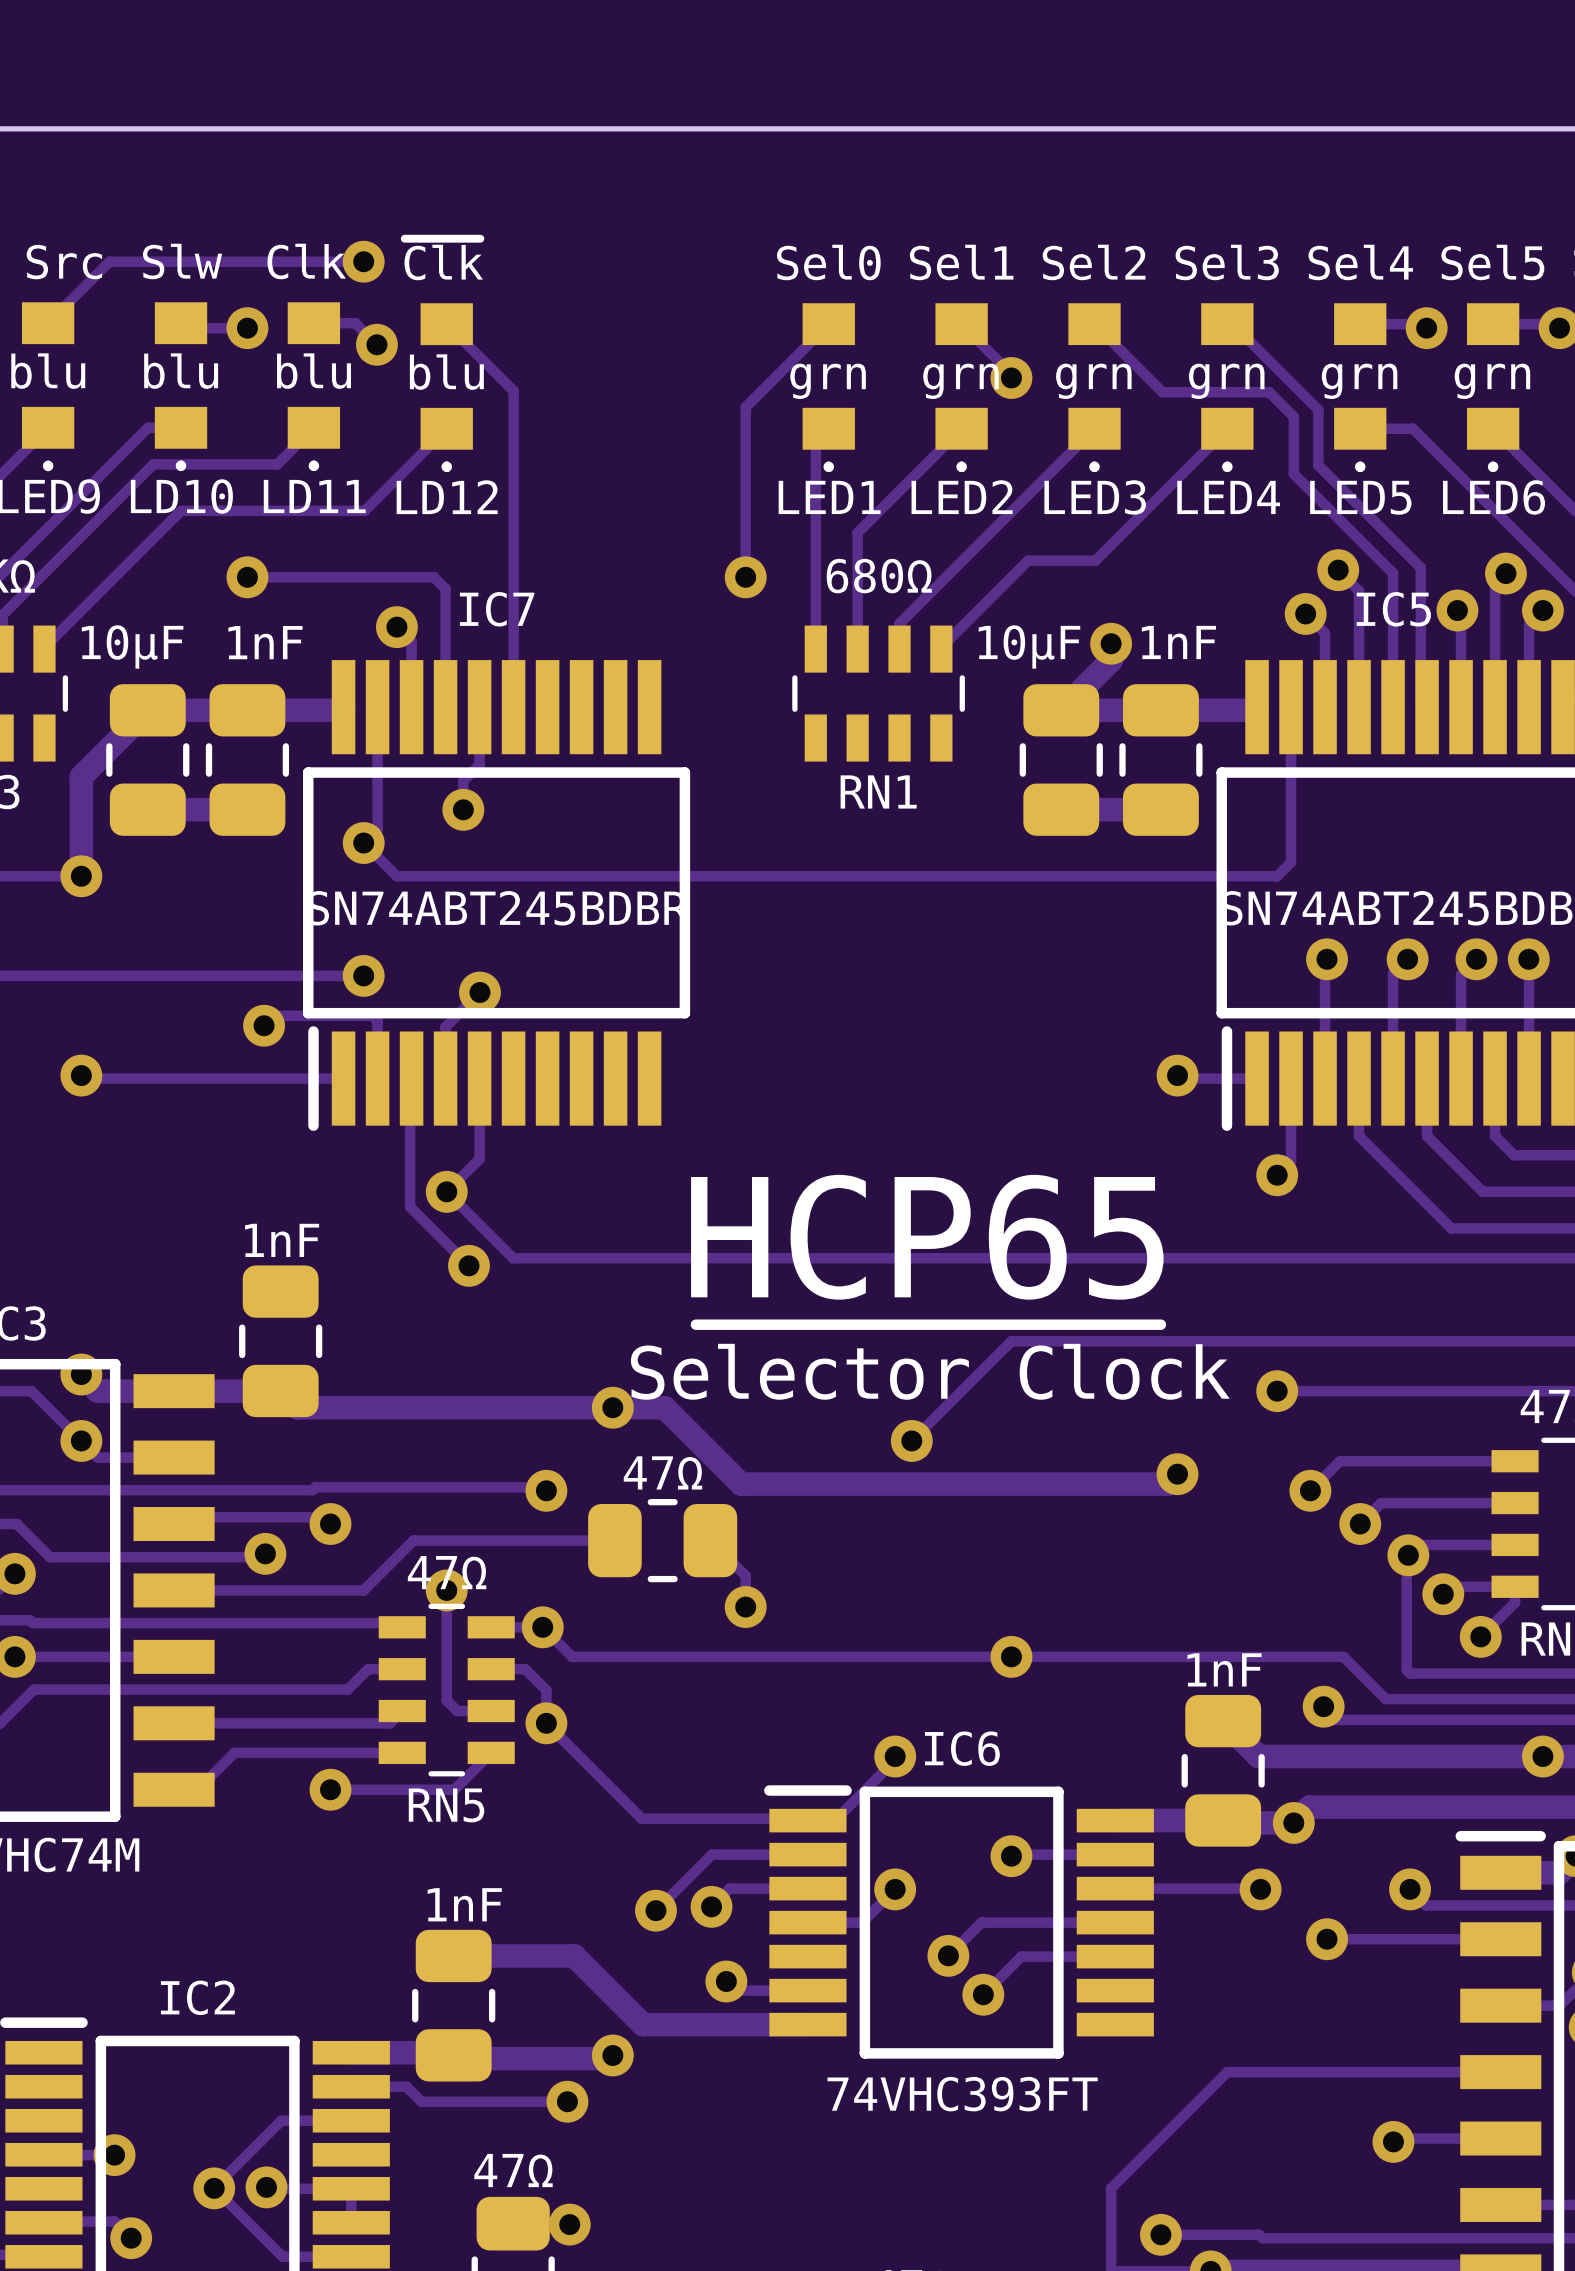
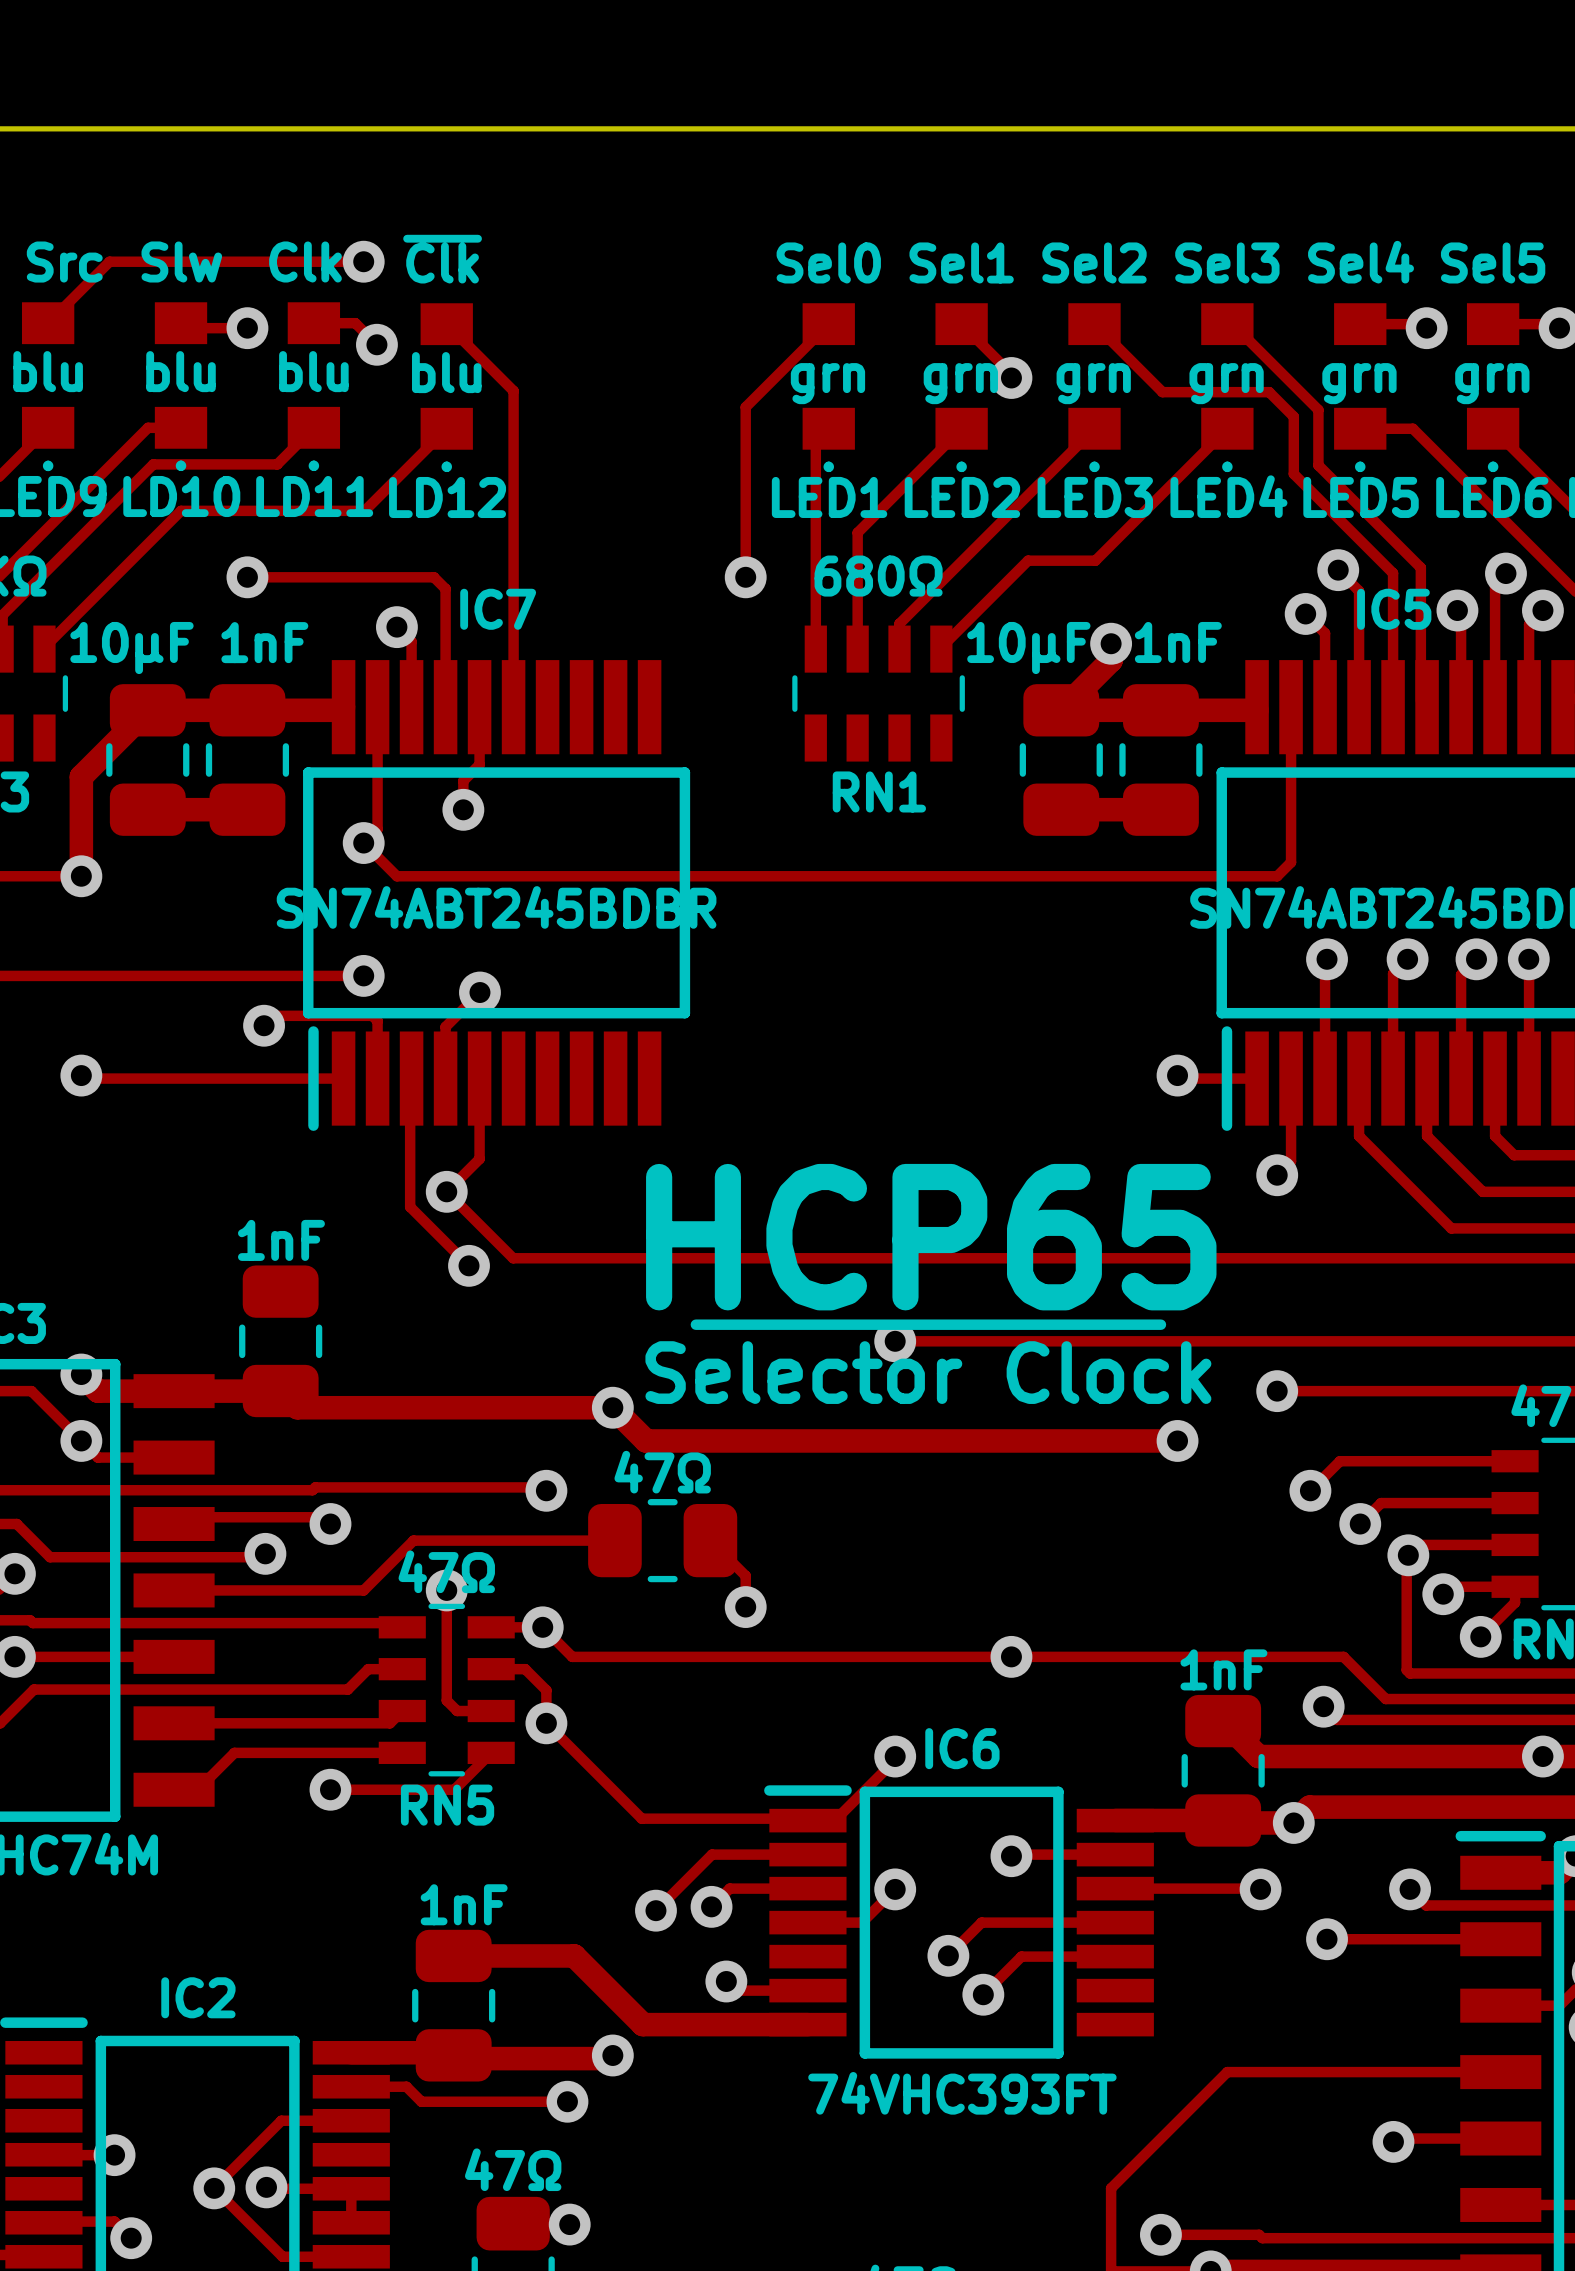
track: (1011, 1341) (911, 1440) -> (1011, 1341) (895, 1341)
track: (612, 1407) (664, 1407) (741, 1484) (1167, 1484) (1177, 1474) -> (612, 1407) (646, 1440) (1177, 1440)
via position: (911, 1440) -> (895, 1341)
via position: (1177, 1474) -> (1177, 1440)

